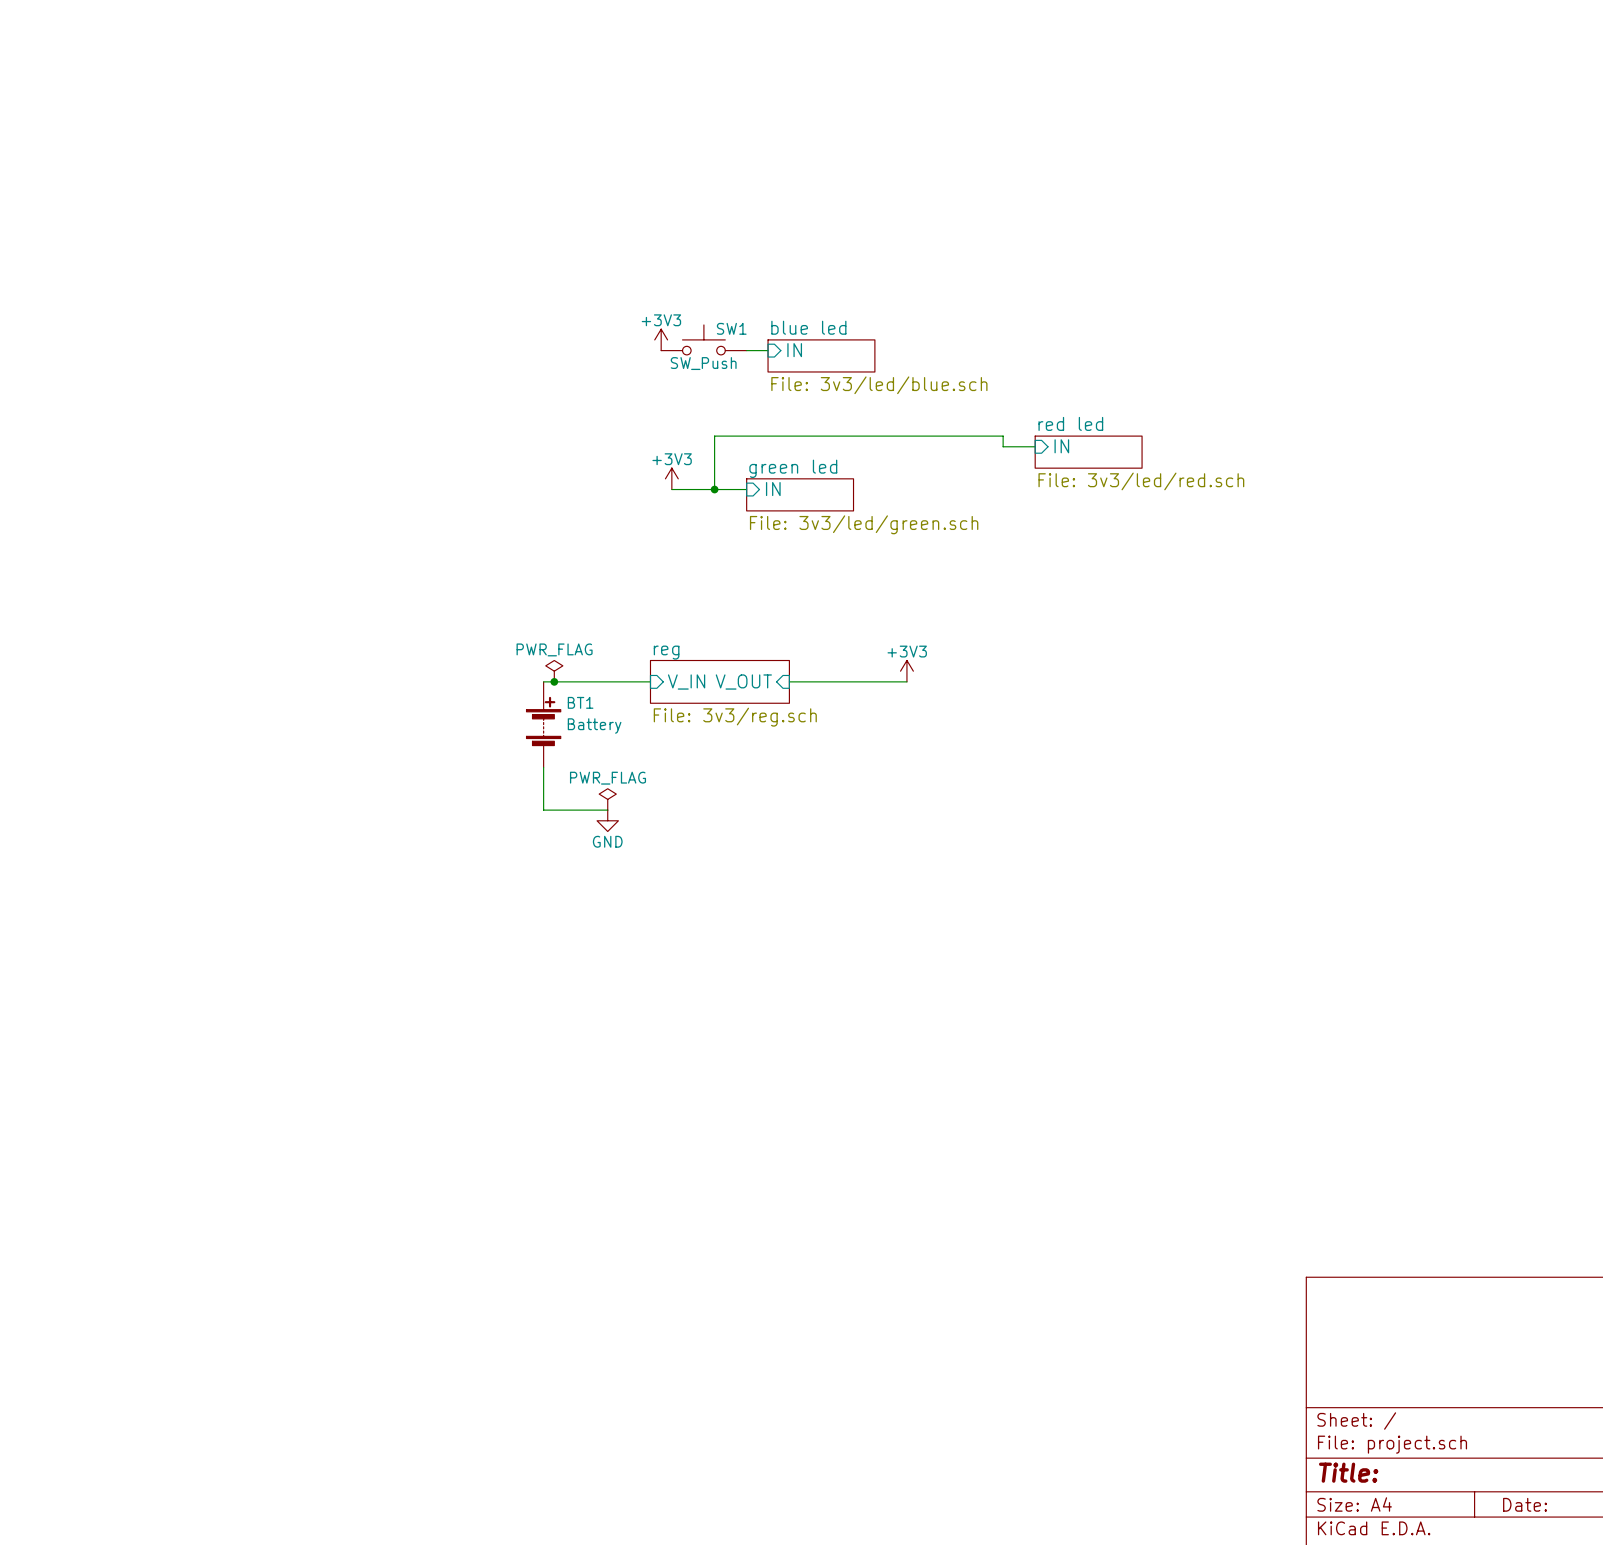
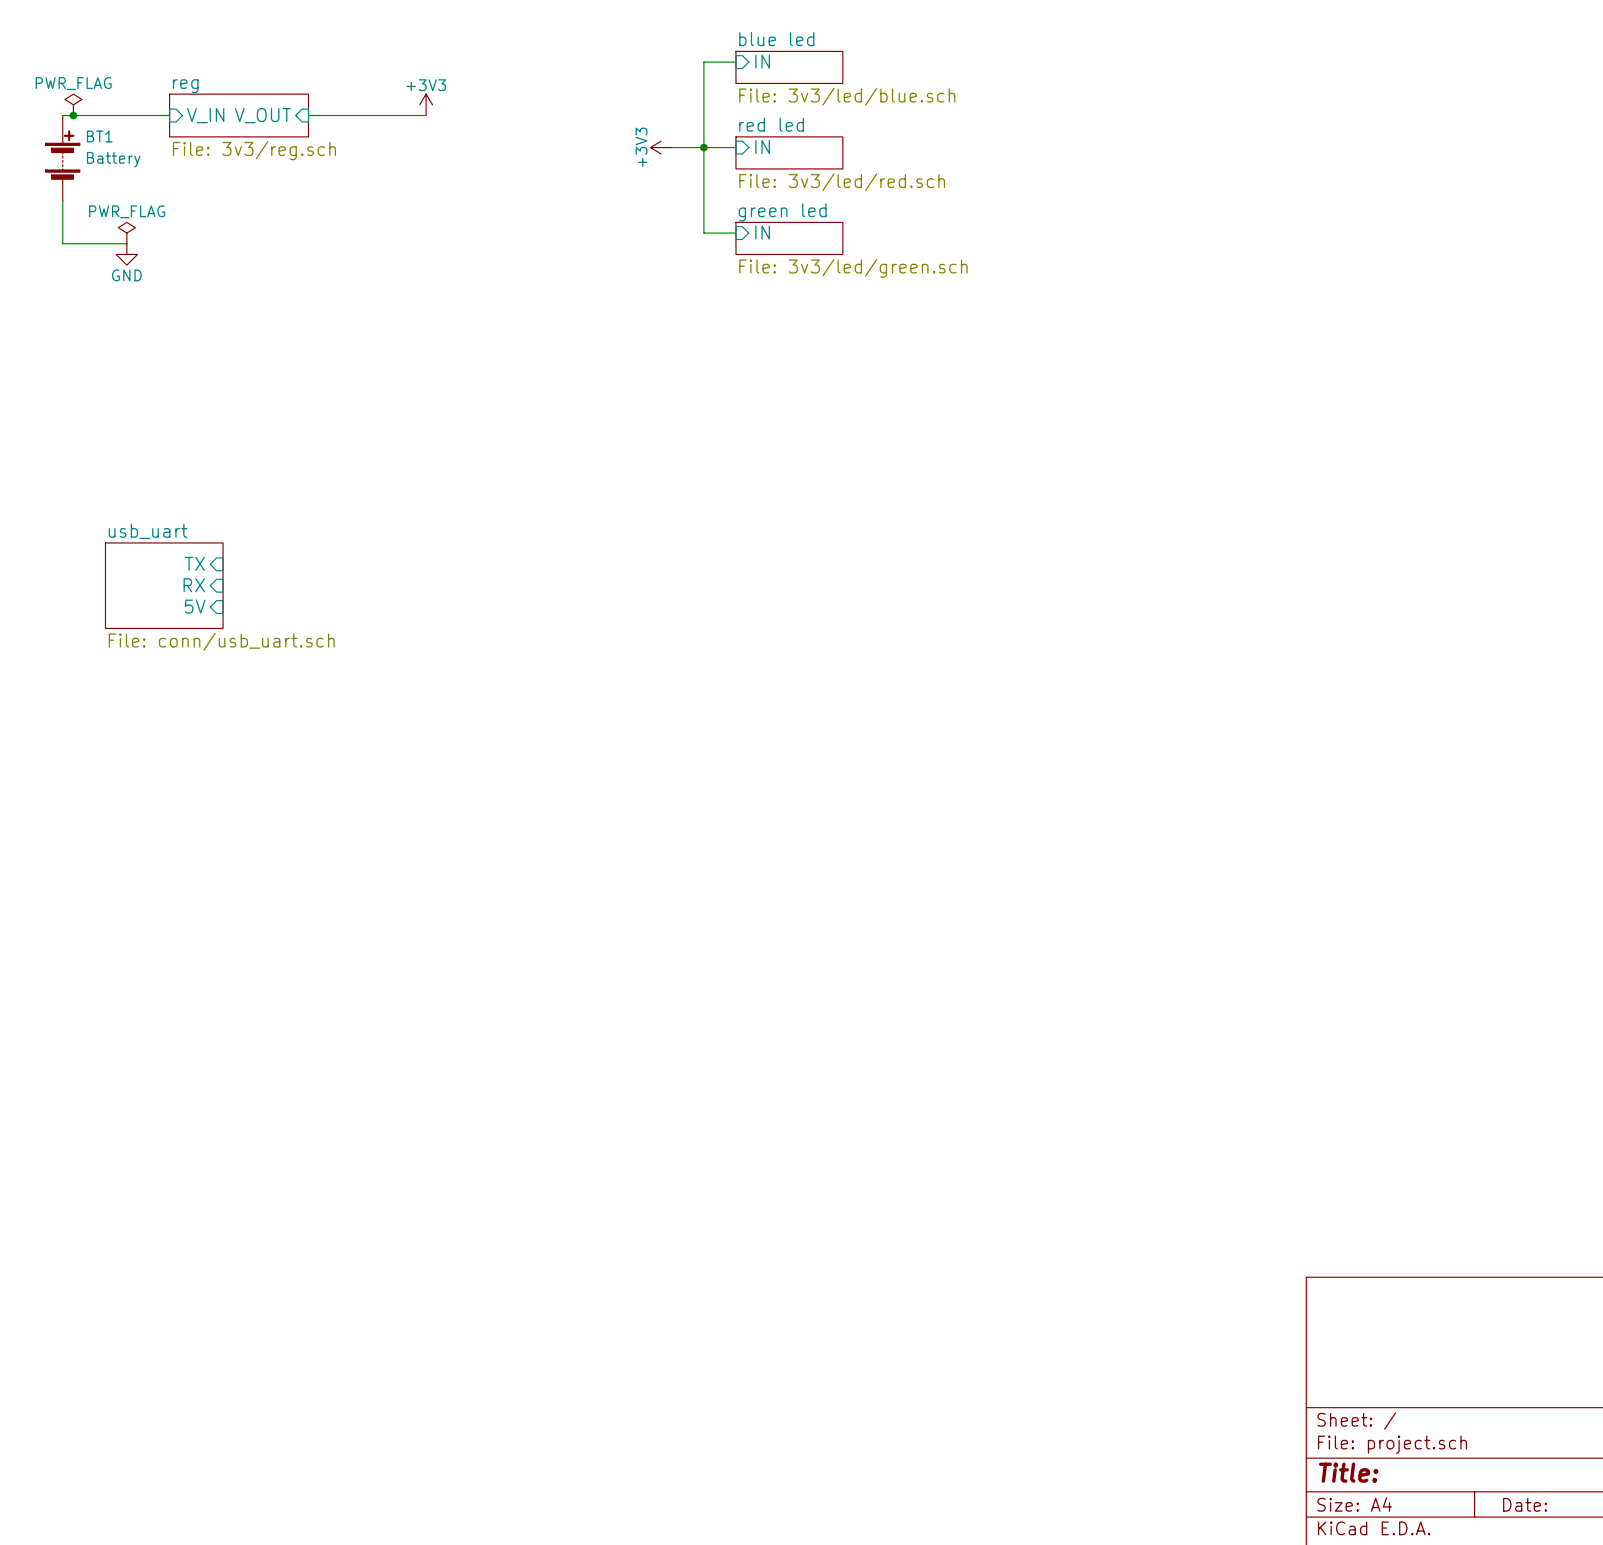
sheet pin: none -> IN (762, 61)
wire: none -> (735, 62) (703, 62) (703, 233) (735, 233)
sheet blue led: none -> File: 3v3/led/blue.sch (789, 67)
power symbol: none -> PWR_FLAG (73, 104)
power symbol: none -> +3V3 (426, 104)
wire: none -> (62, 115) (169, 115)
junction: none -> (73, 115)
sheet pin: none -> V_IN (205, 115)
sheet reg: none -> File: 3v3/reg.sch (239, 115)
sheet pin: none -> V_OUT (262, 115)
wire: none -> (308, 115) (426, 115)
power symbol: none -> +3V3 (661, 147)
wire: none -> (671, 147) (735, 147)
junction: none -> (703, 147)
sheet pin: none -> IN (762, 147)
sheet red led: none -> File: 3v3/led/red.sch (789, 152)
wire: none -> (62, 201) (62, 243) (126, 243)
sheet pin: none -> IN (762, 232)
power symbol: none -> PWR_FLAG (126, 233)
sheet green led: none -> File: 3v3/led/green.sch (789, 238)
power symbol: none -> GND (126, 254)
power symbol: +3V3 (661, 339) -> none
SW1: SW_Push (703, 339) -> none
wire: (746, 350) (768, 350) -> none
sheet pin: IN (794, 350) -> none
sheet blue led: File: 3v3/led/blue.sch (821, 355) -> none
wire: (1035, 446) (1003, 446) (1003, 436) (714, 436) (714, 489) -> none
sheet pin: IN (1061, 446) -> none
sheet red led: File: 3v3/led/red.sch (1088, 452) -> none
power symbol: +3V3 (671, 478) -> none
wire: (671, 489) (746, 489) -> none
junction: (714, 489) -> none
sheet pin: IN (773, 489) -> none
sheet green led: File: 3v3/led/green.sch (800, 494) -> none
sheet pin: none -> TX (194, 563)
sheet usb_uart: none -> File: conn/usb_uart.sch (164, 585)
sheet pin: none -> RX (194, 585)
sheet pin: none -> 5V (195, 606)
power symbol: PWR_FLAG (554, 671) -> none
power symbol: +3V3 (906, 671) -> none
wire: (543, 681) (650, 681) -> none
junction: (554, 681) -> none
sheet reg: File: 3v3/reg.sch (719, 681) -> none
wire: (789, 681) (906, 681) -> none
sheet pin: V_IN (686, 682) -> none
sheet pin: V_OUT (743, 682) -> none
BT1 position: (543, 724) -> (62, 158)
wire: (543, 767) (543, 810) (607, 810) -> none
power symbol: PWR_FLAG (607, 799) -> none
power symbol: GND (607, 820) -> none

